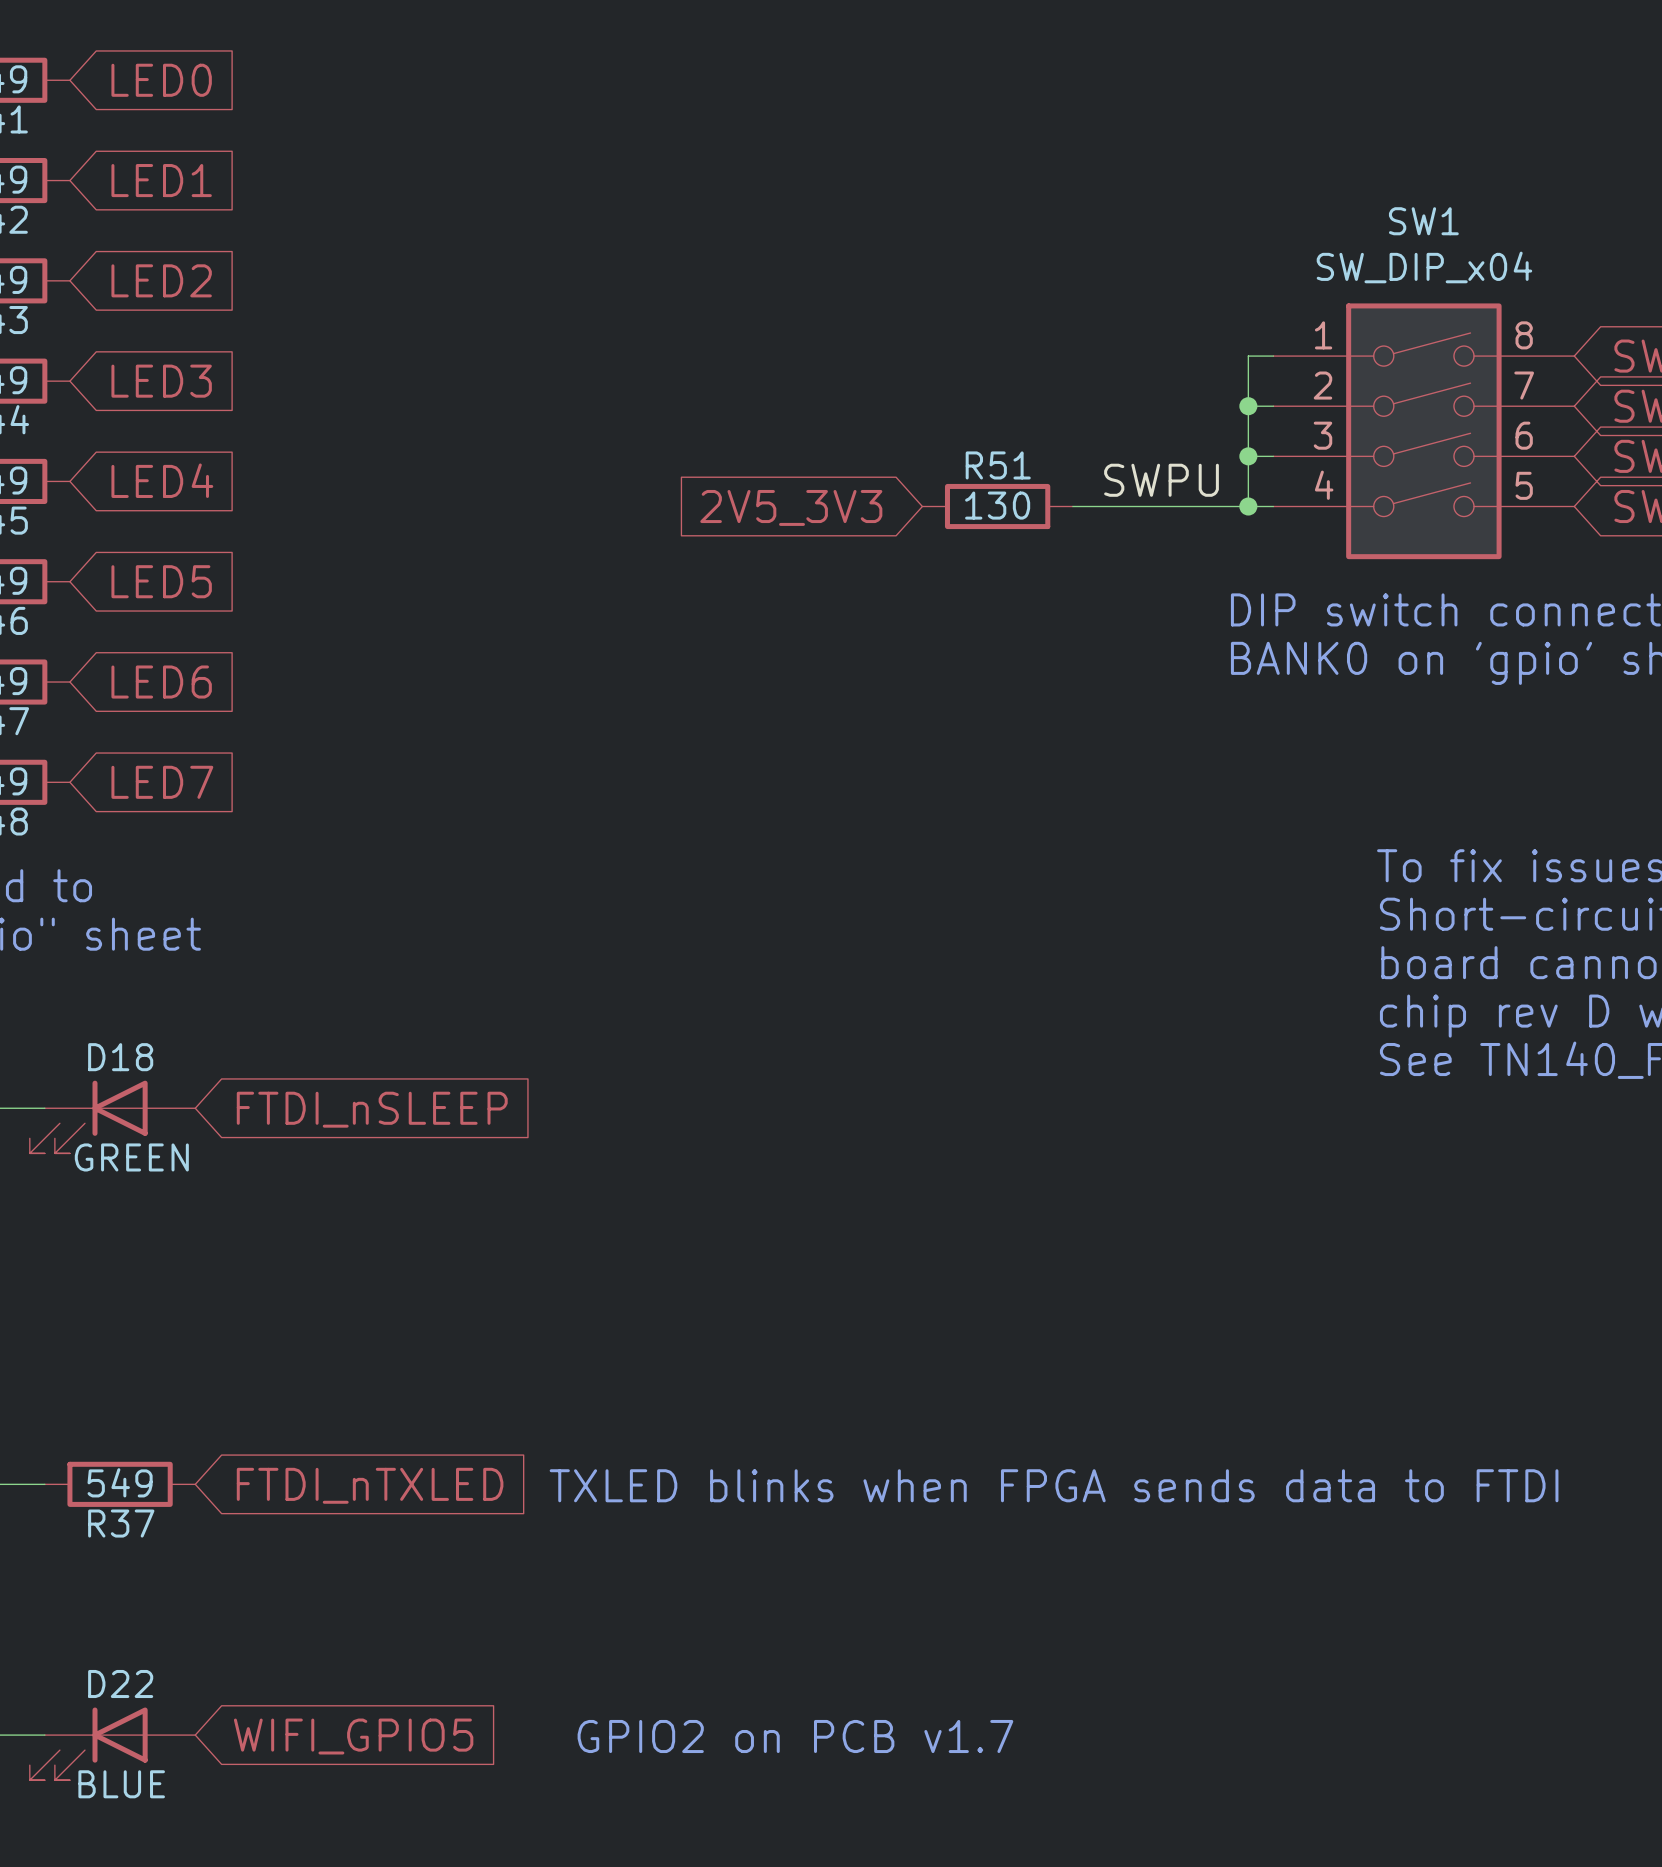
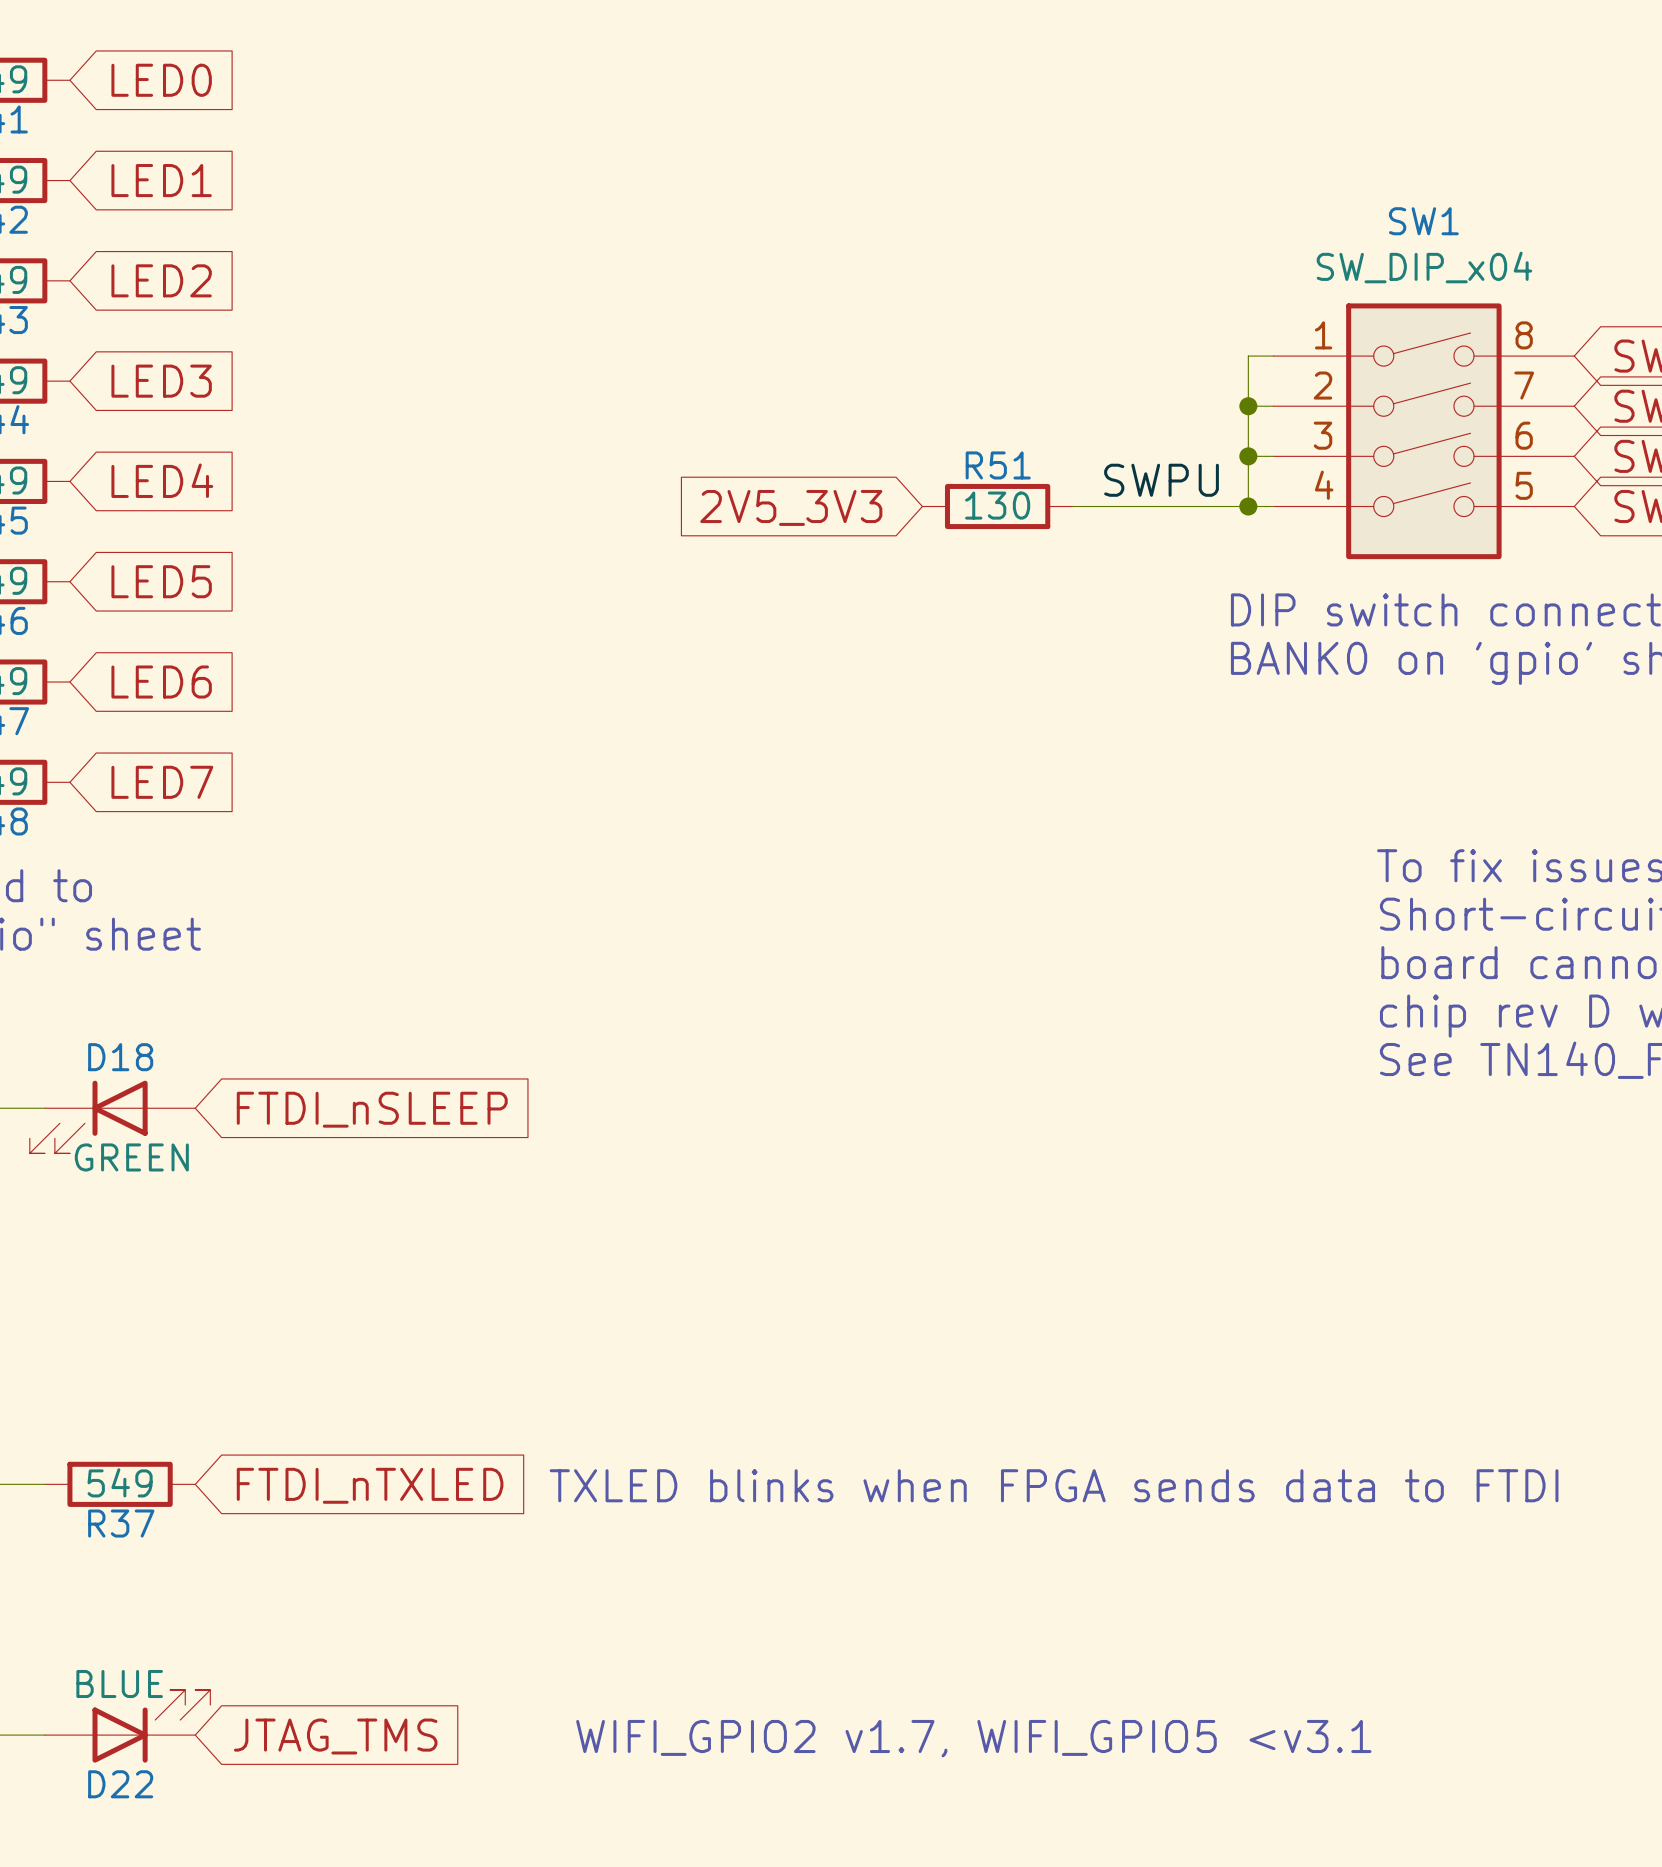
global label: WIFI_GPIO5 (353, 1736) -> JTAG_TMS (335, 1736)
text: GPIO2 on PCB v1.7 (795, 1736) -> WIFI_GPIO2 v1.7, WIFI_GPIO5 <v3.1 (973, 1738)
D22 rotation: 0° (88, 1743) -> 180° (151, 1726)

